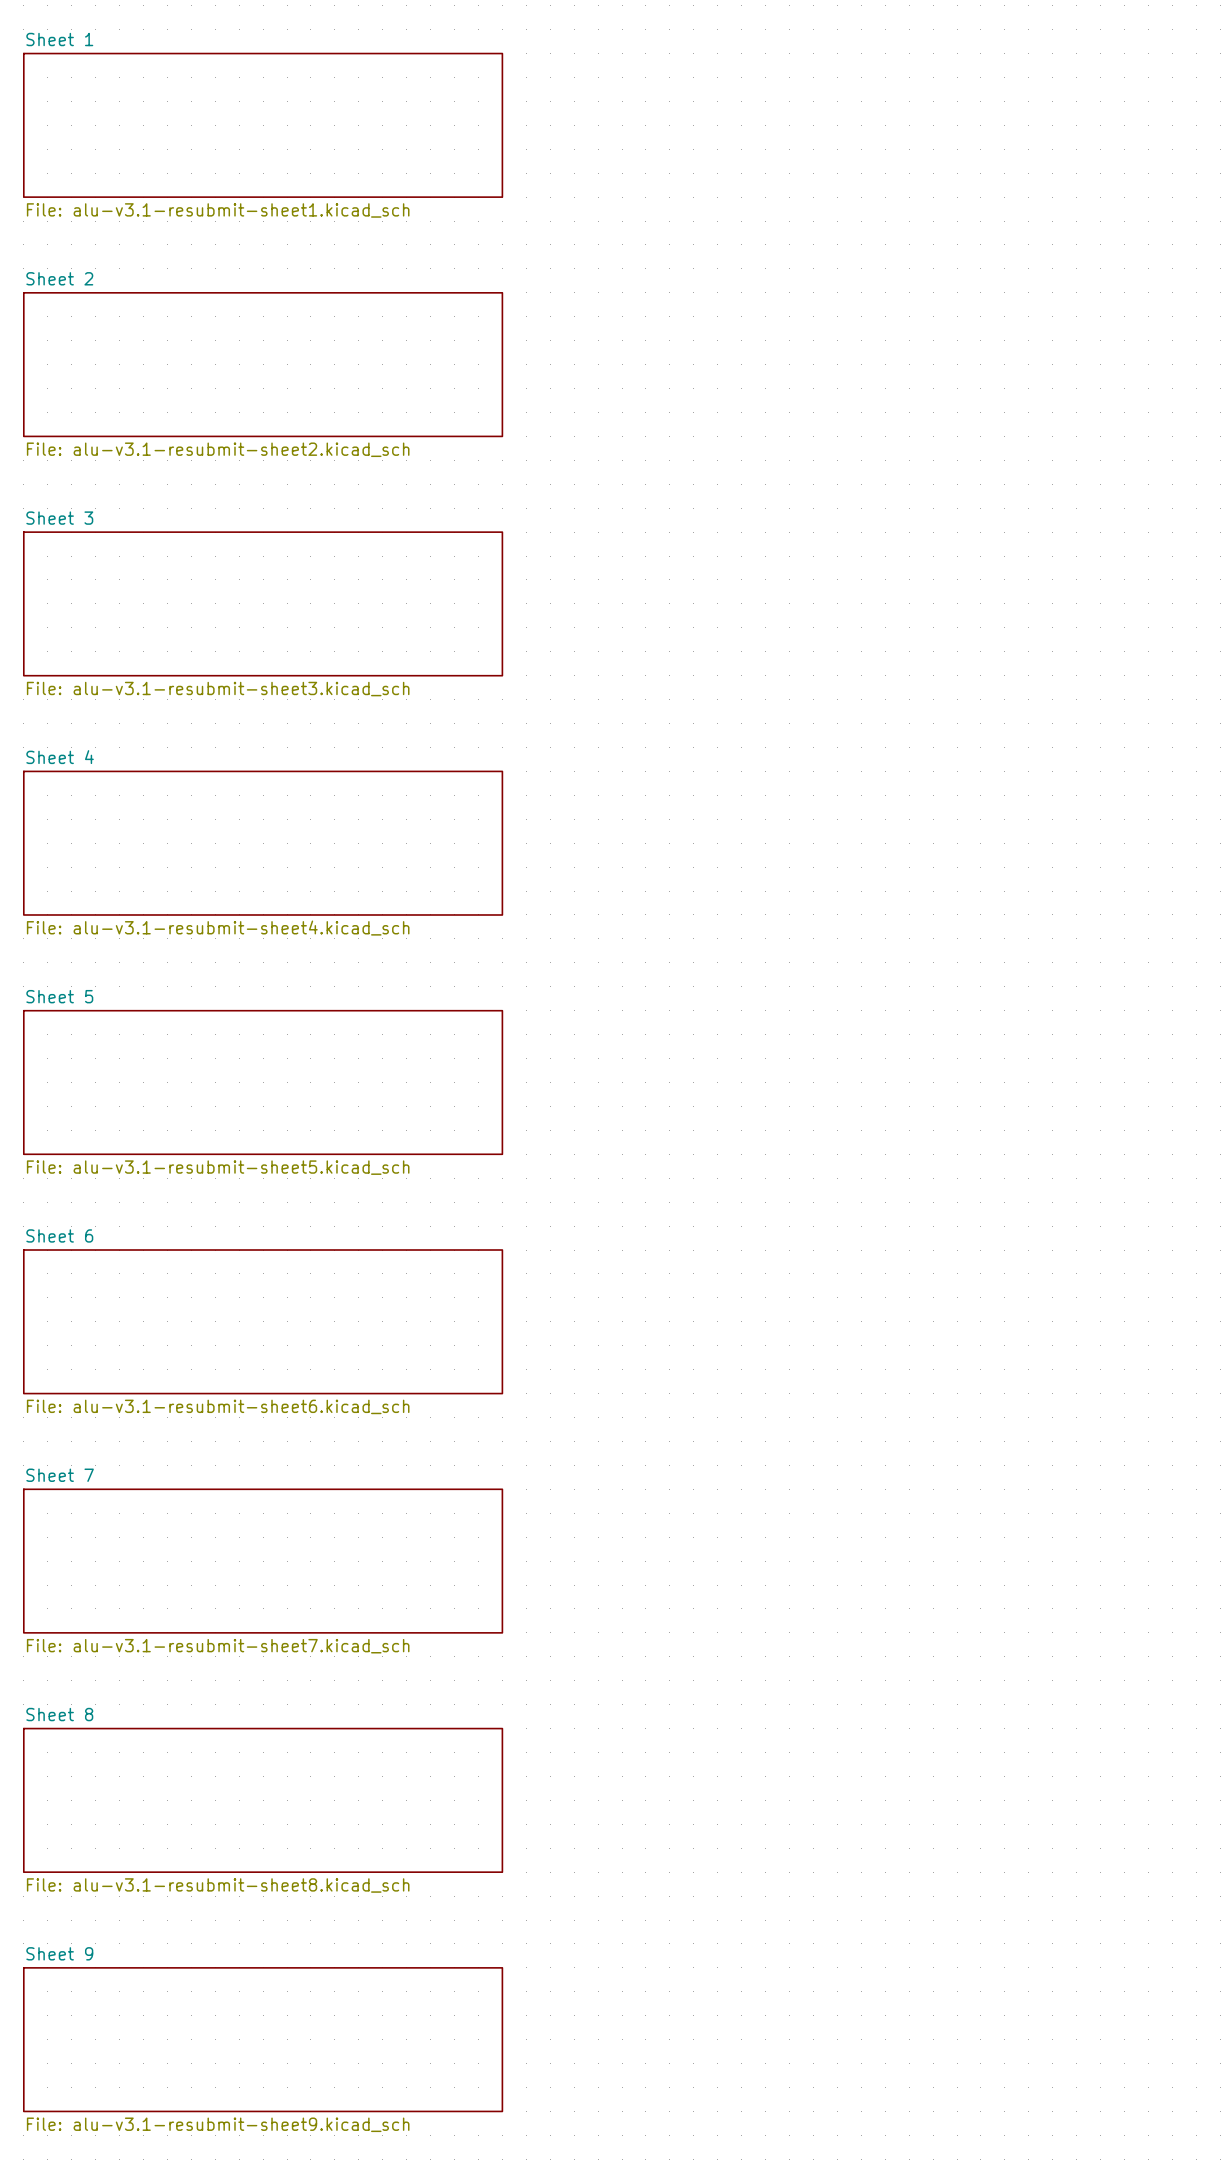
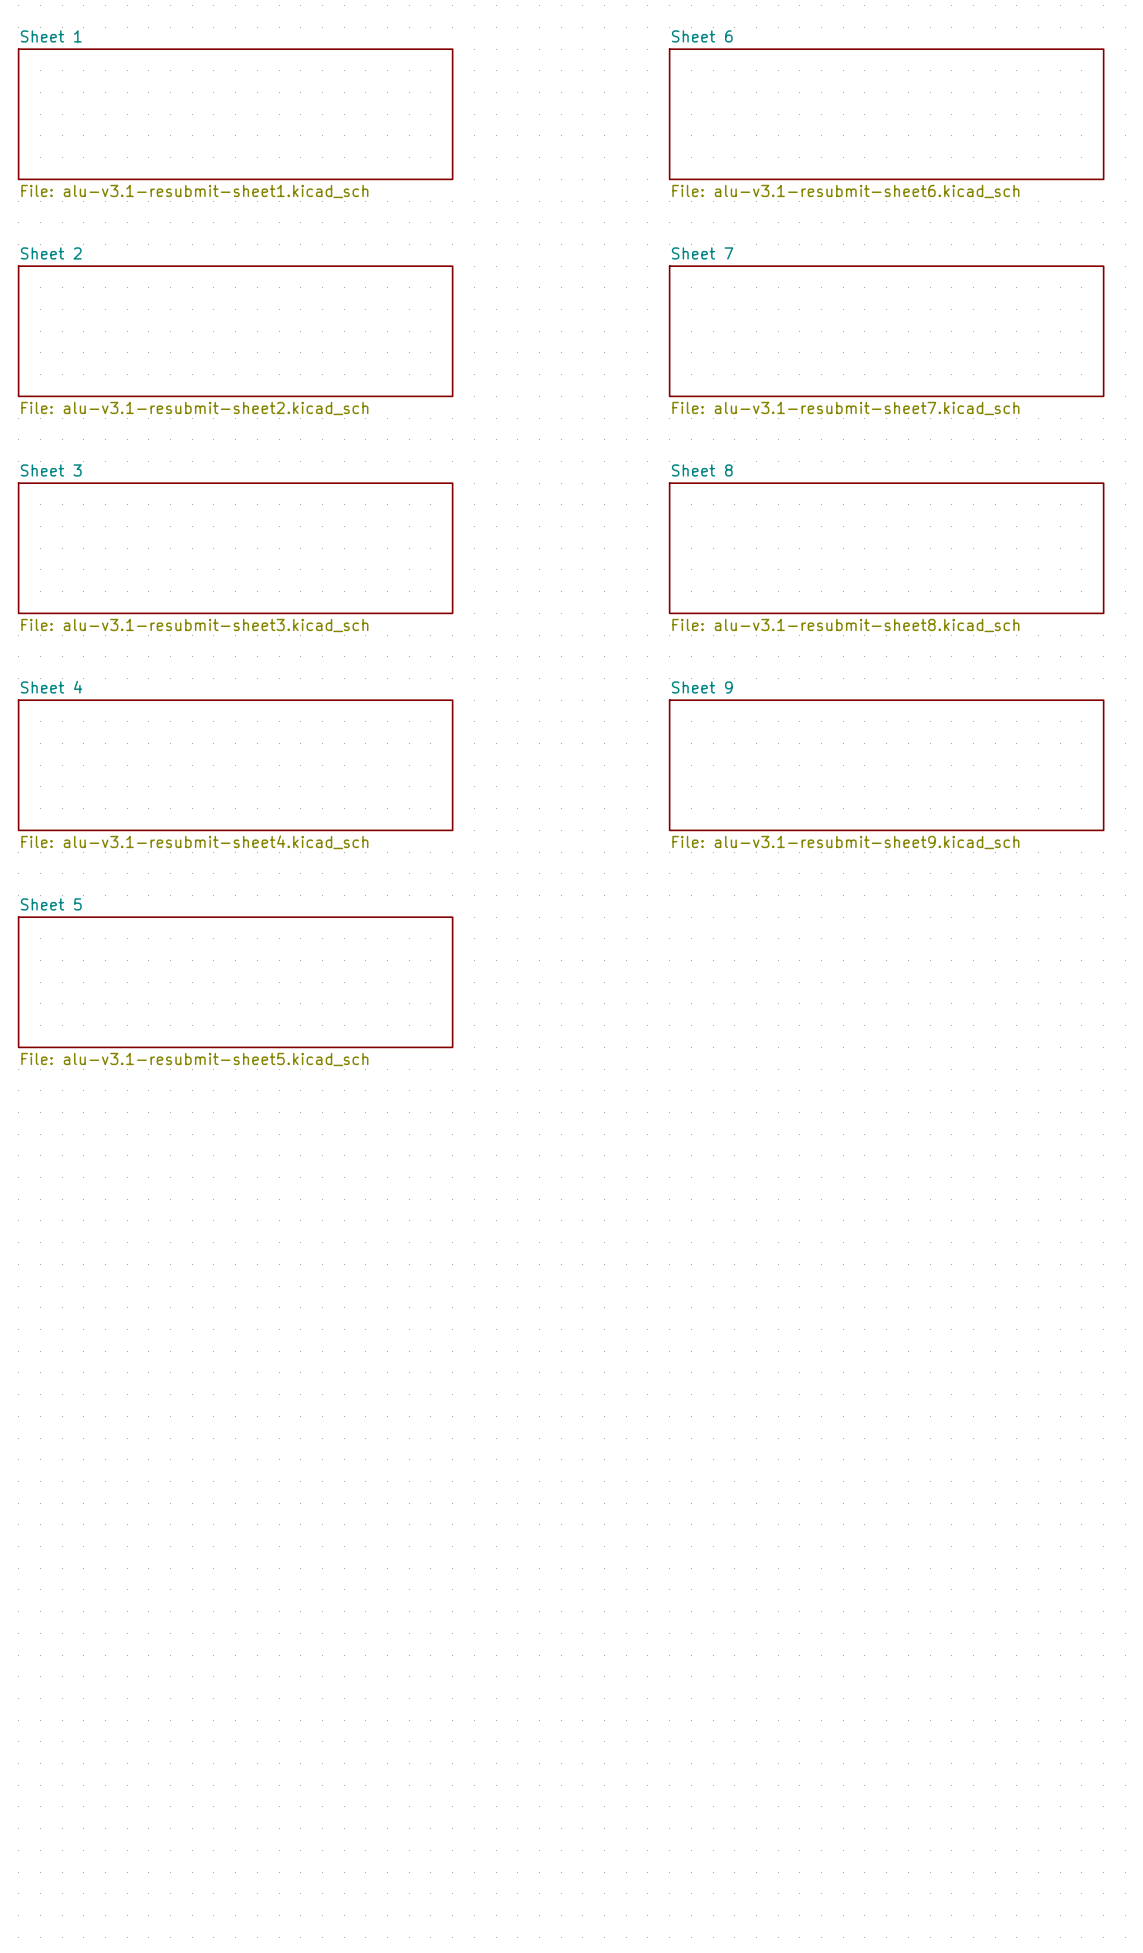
sheet Sheet 6 position: (263, 1321) -> (886, 114)
sheet Sheet 7 position: (263, 1561) -> (886, 331)
sheet Sheet 8 position: (263, 1800) -> (886, 548)
sheet Sheet 9 position: (263, 2039) -> (886, 765)

